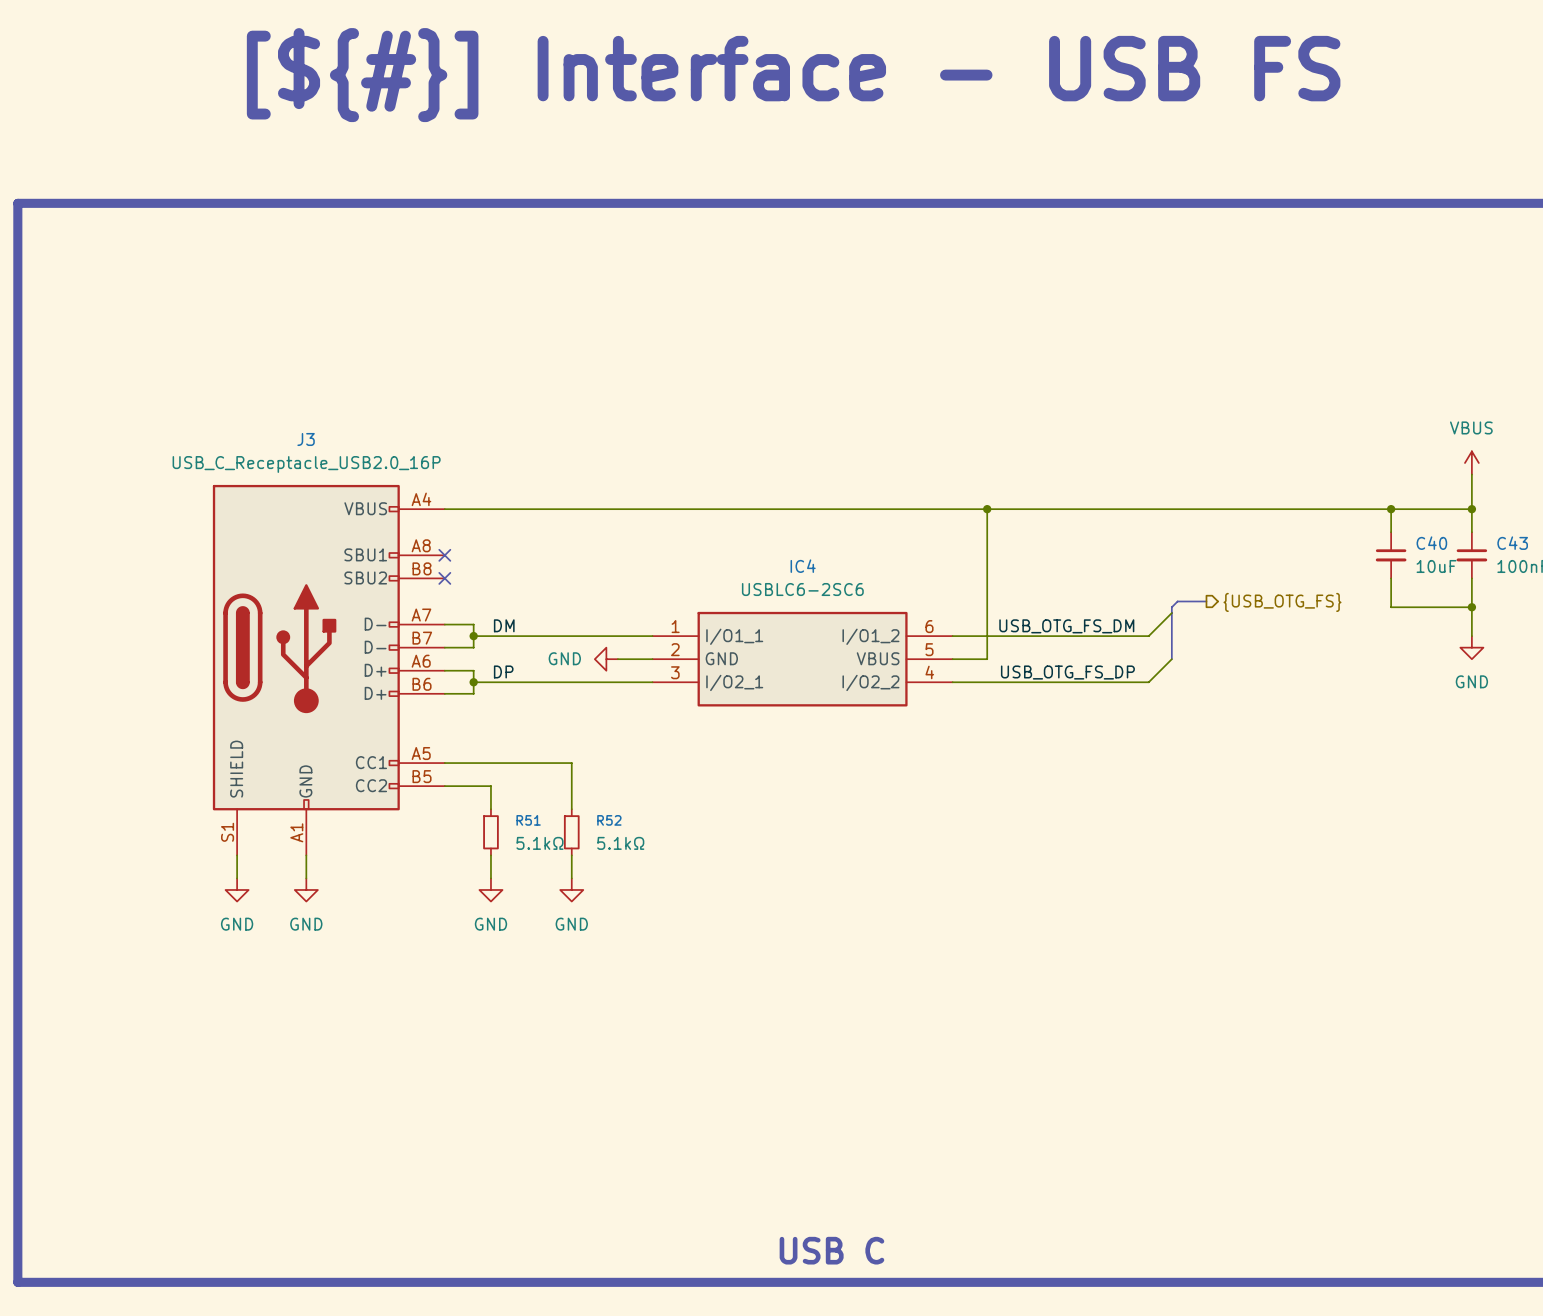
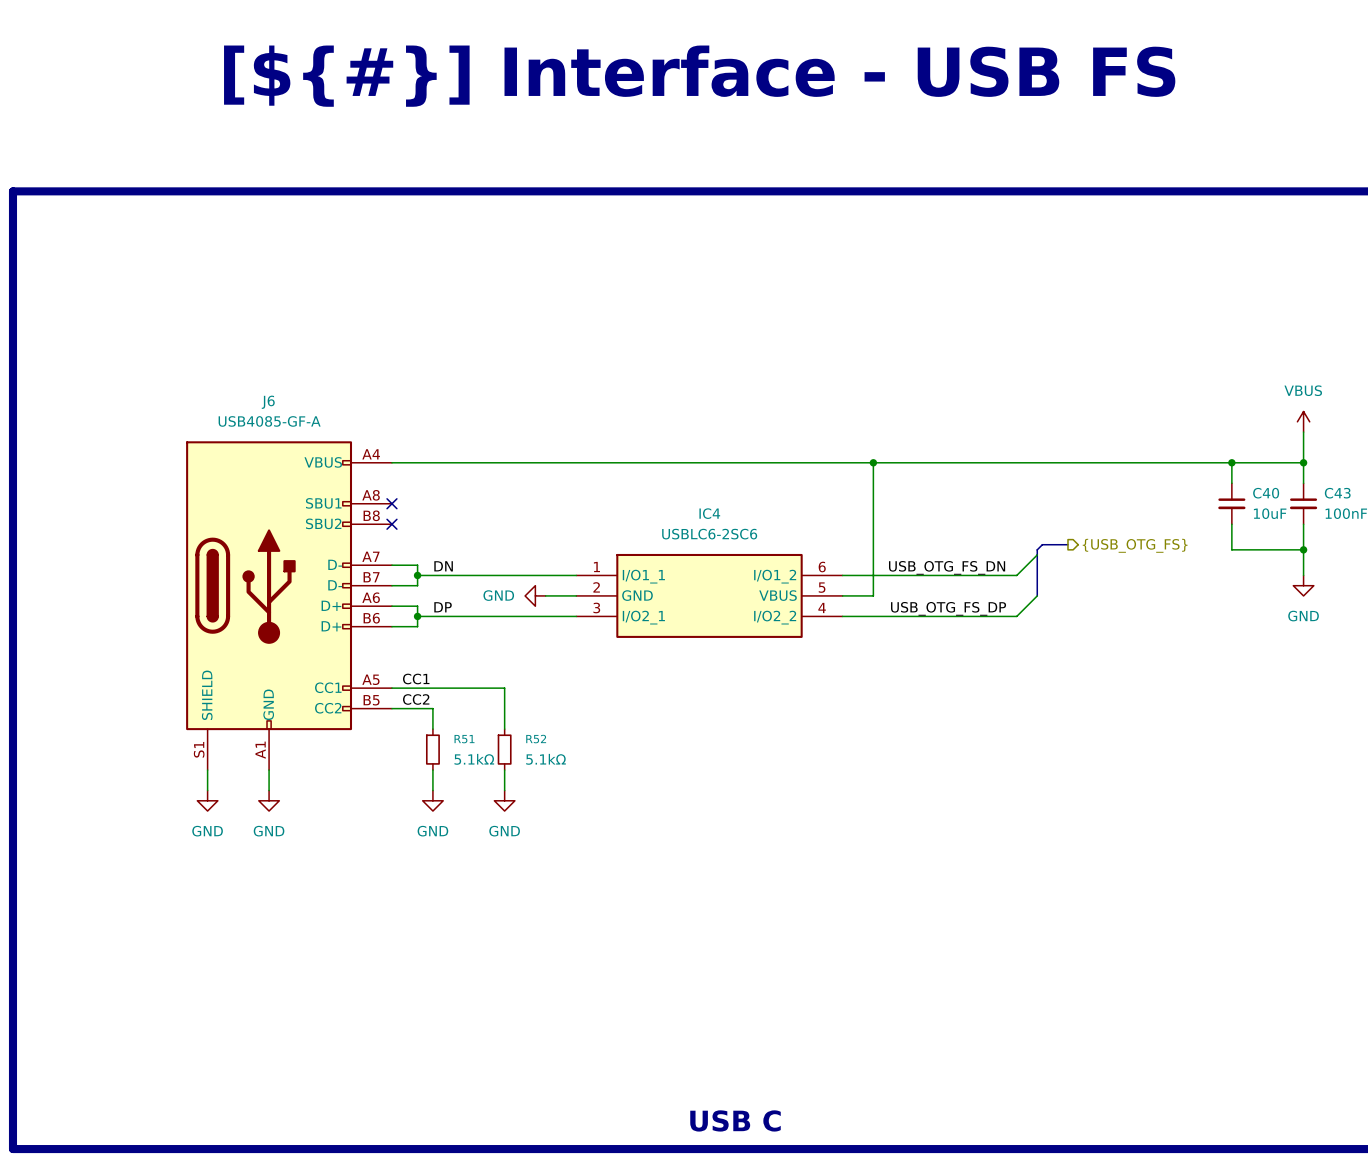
J3 name: J3 (306, 439) -> J6 (268, 402)
J3 value: USB_C_Receptacle_USB2.0_16P (306, 464) -> USB4085-GF-A (269, 421)
label: DM (504, 625) -> DN (443, 566)
label: USB_OTG_FS_DM (1066, 626) -> USB_OTG_FS_DN (947, 567)
label: none -> CC1 (416, 679)
label: none -> CC2 (416, 699)

